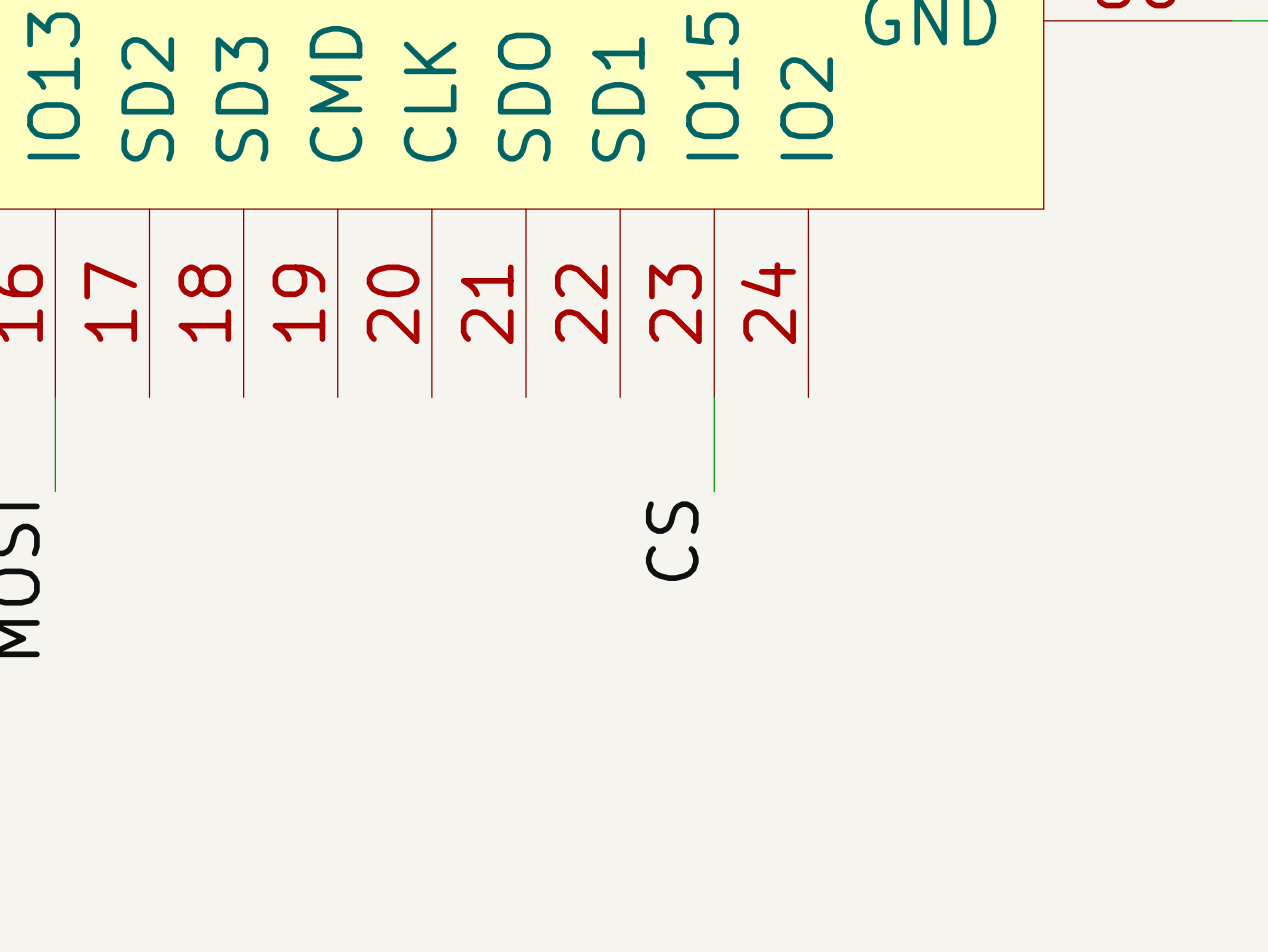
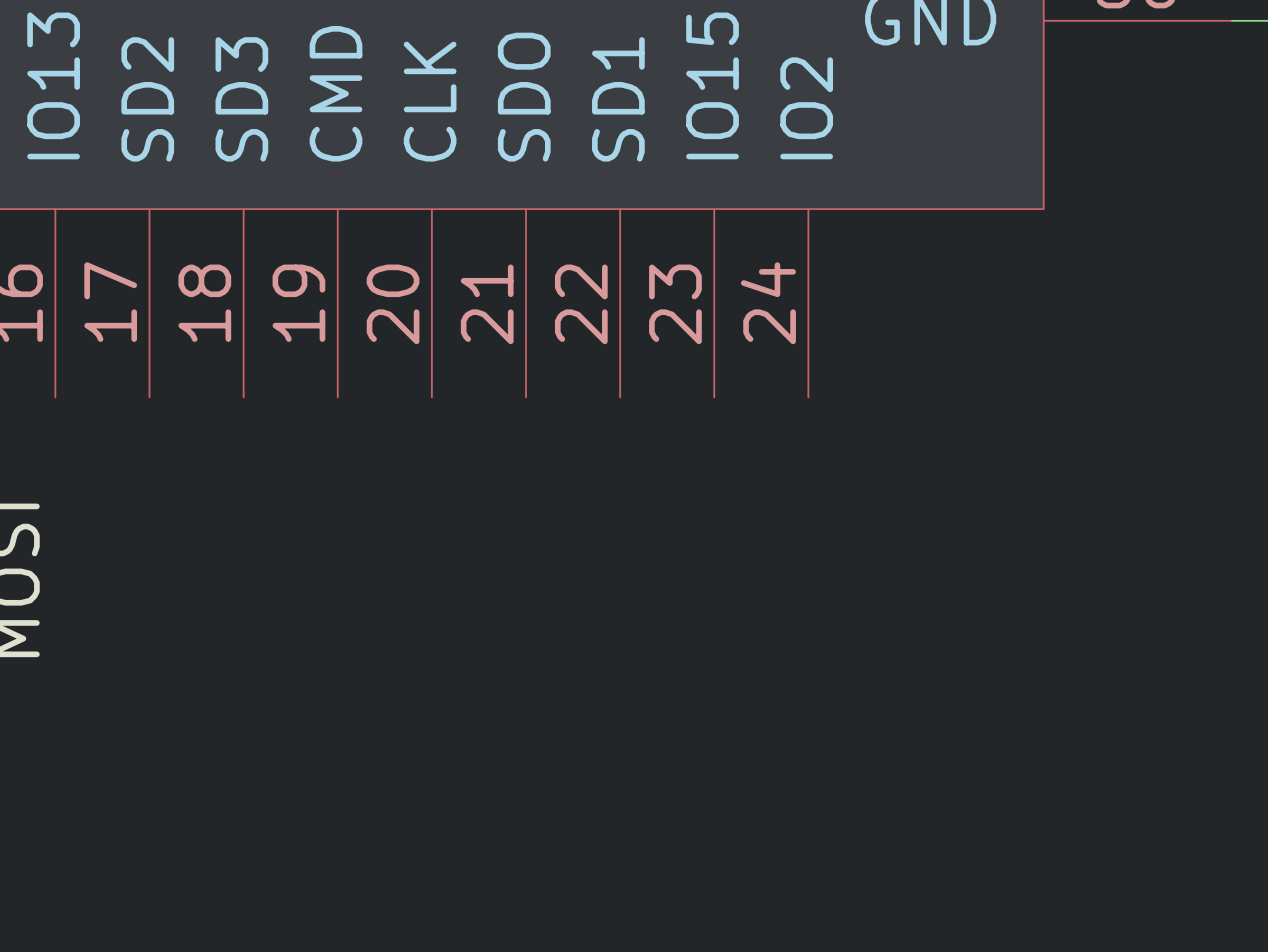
wire: (55, 397) (55, 491) -> none
wire: (714, 397) (714, 491) -> none
label: CS (672, 541) -> none

